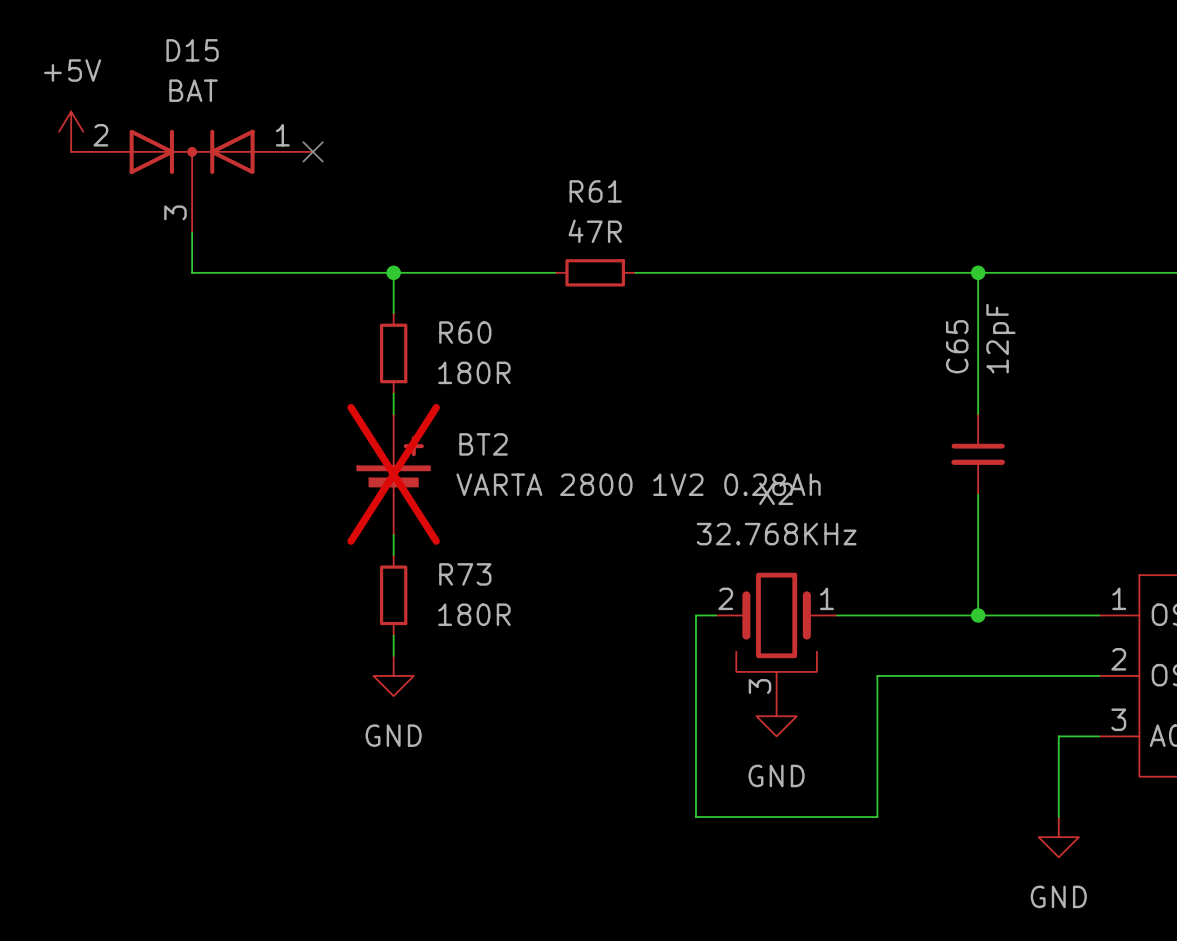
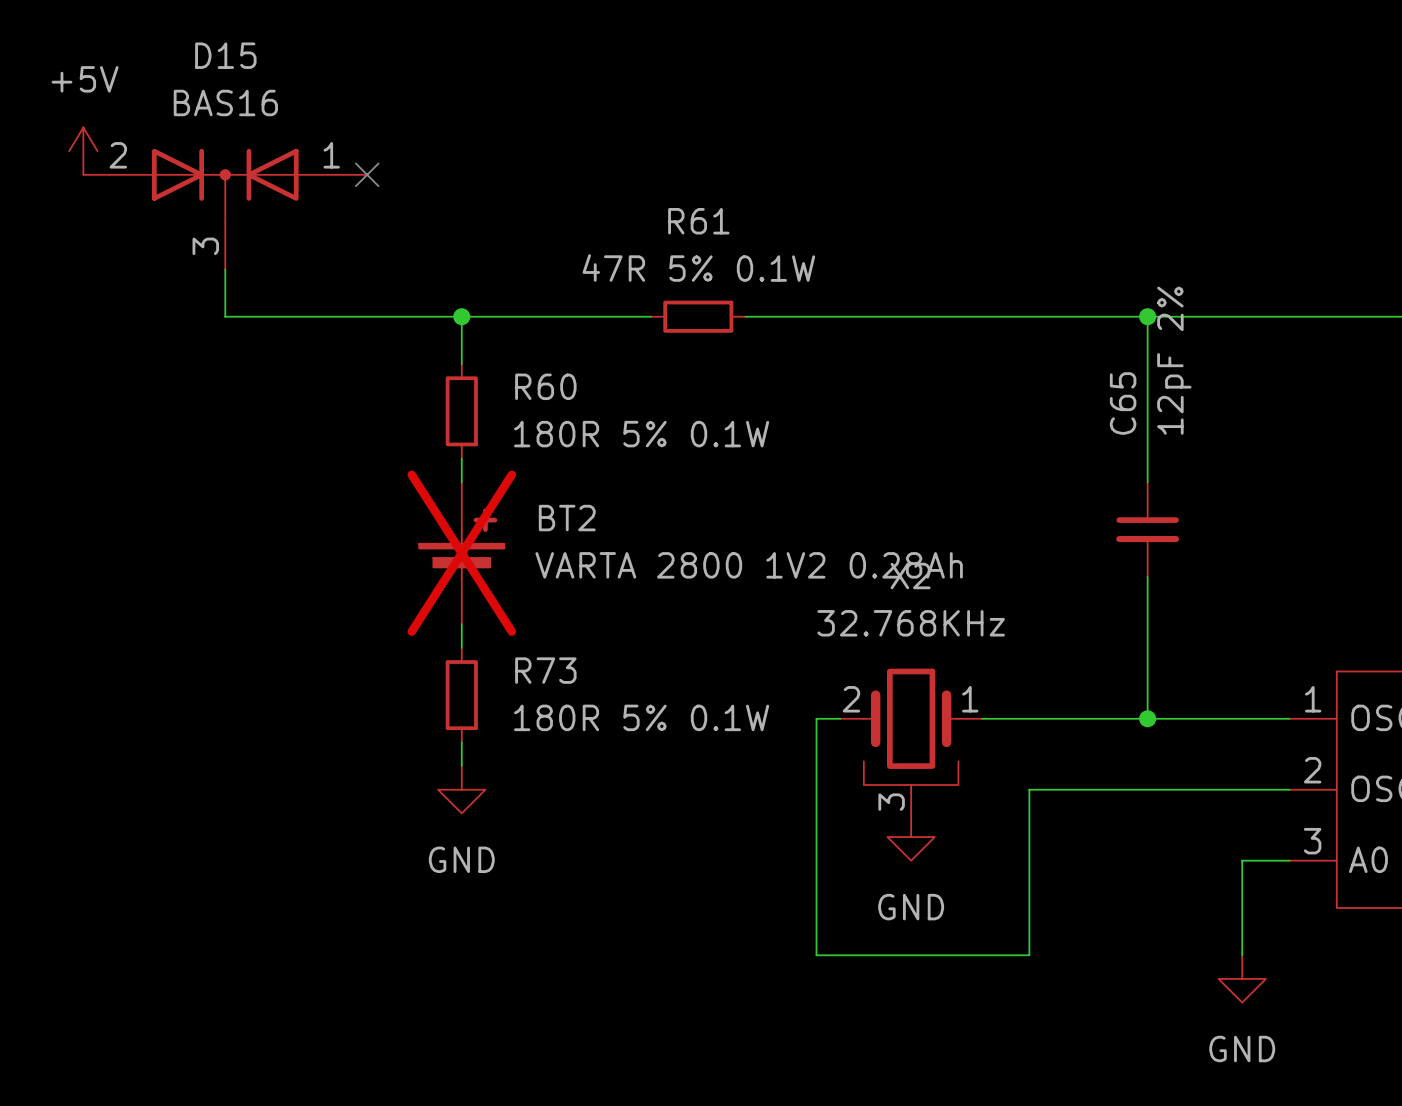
D15 value: BAT (193, 90) -> BAS16 (225, 102)
R61 value: 47R (595, 231) -> 47R 5% 0.1W (698, 267)
C65 value: 12pF (1000, 338) -> 12pF 2% (1174, 360)
R60 value: 180R (474, 372) -> 180R 5% 0.1W (641, 434)
R73 value: 180R (474, 614) -> 180R 5% 0.1W (641, 717)

